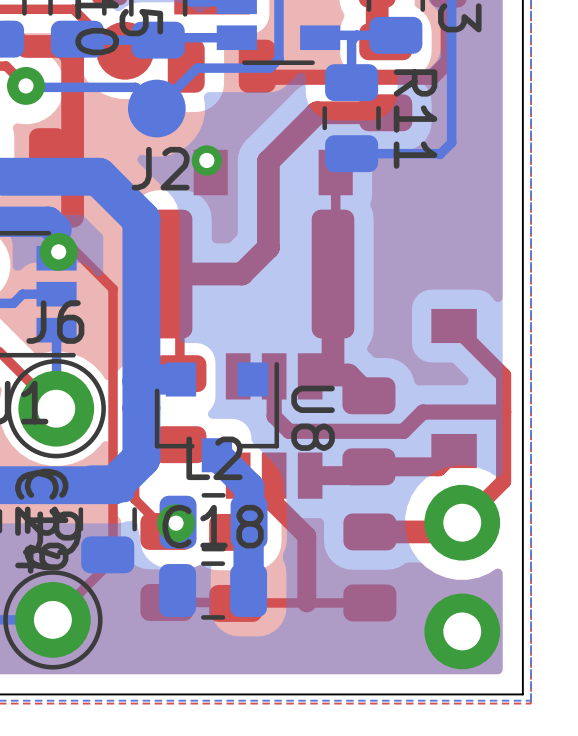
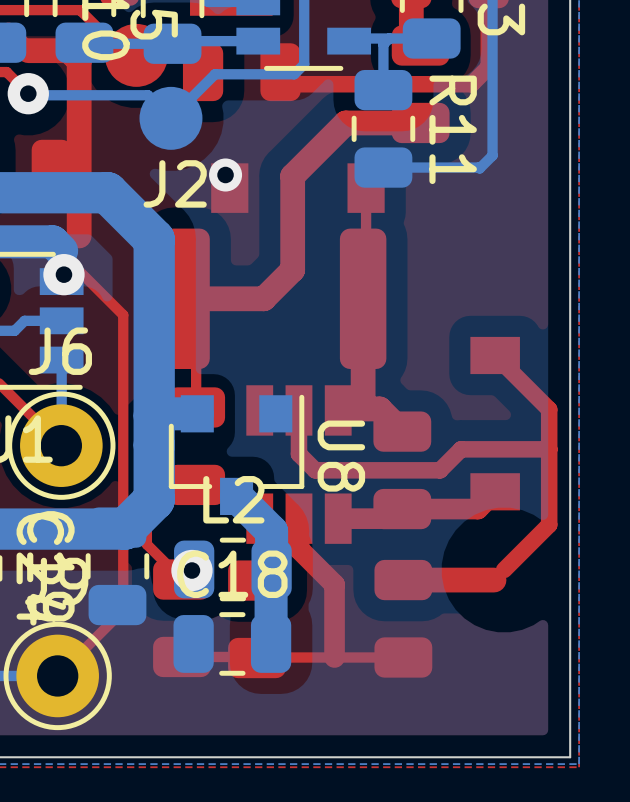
part: (462, 522) -> none
part: (462, 631) -> none

